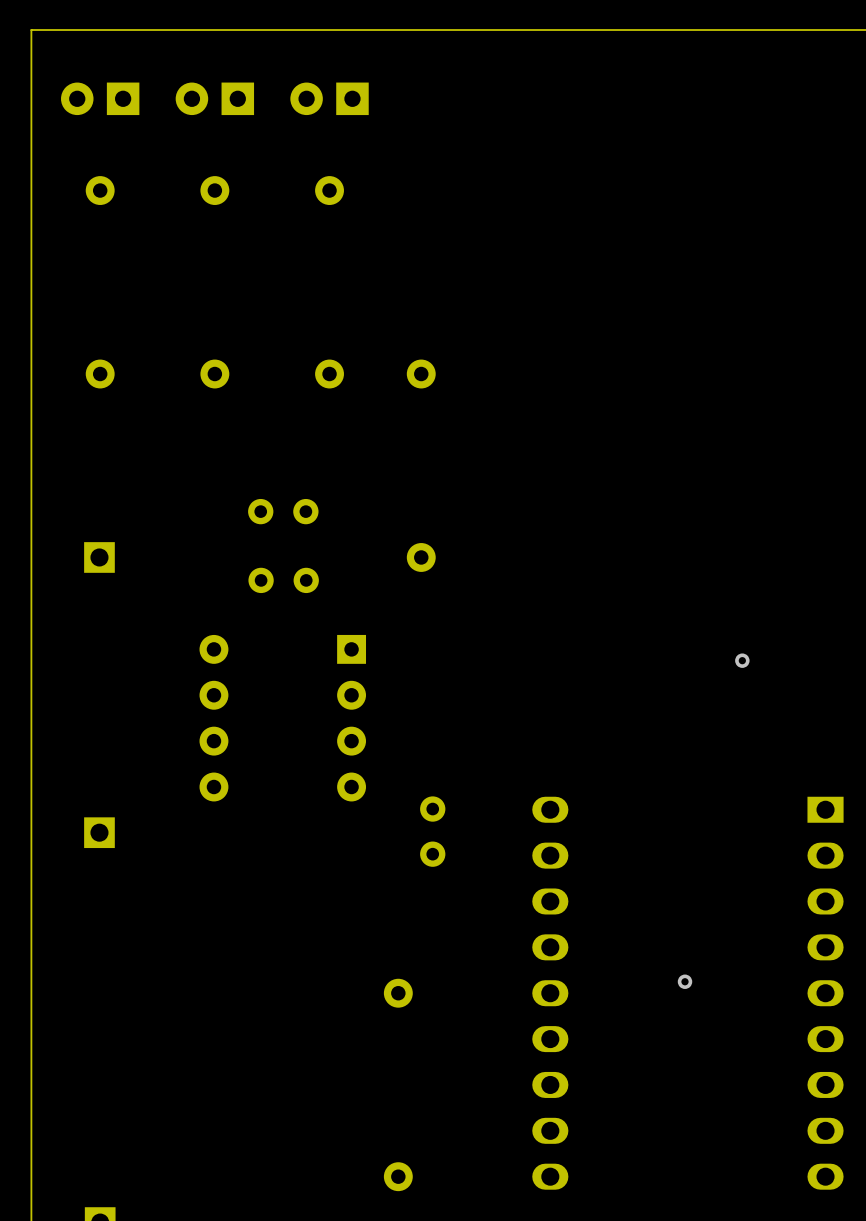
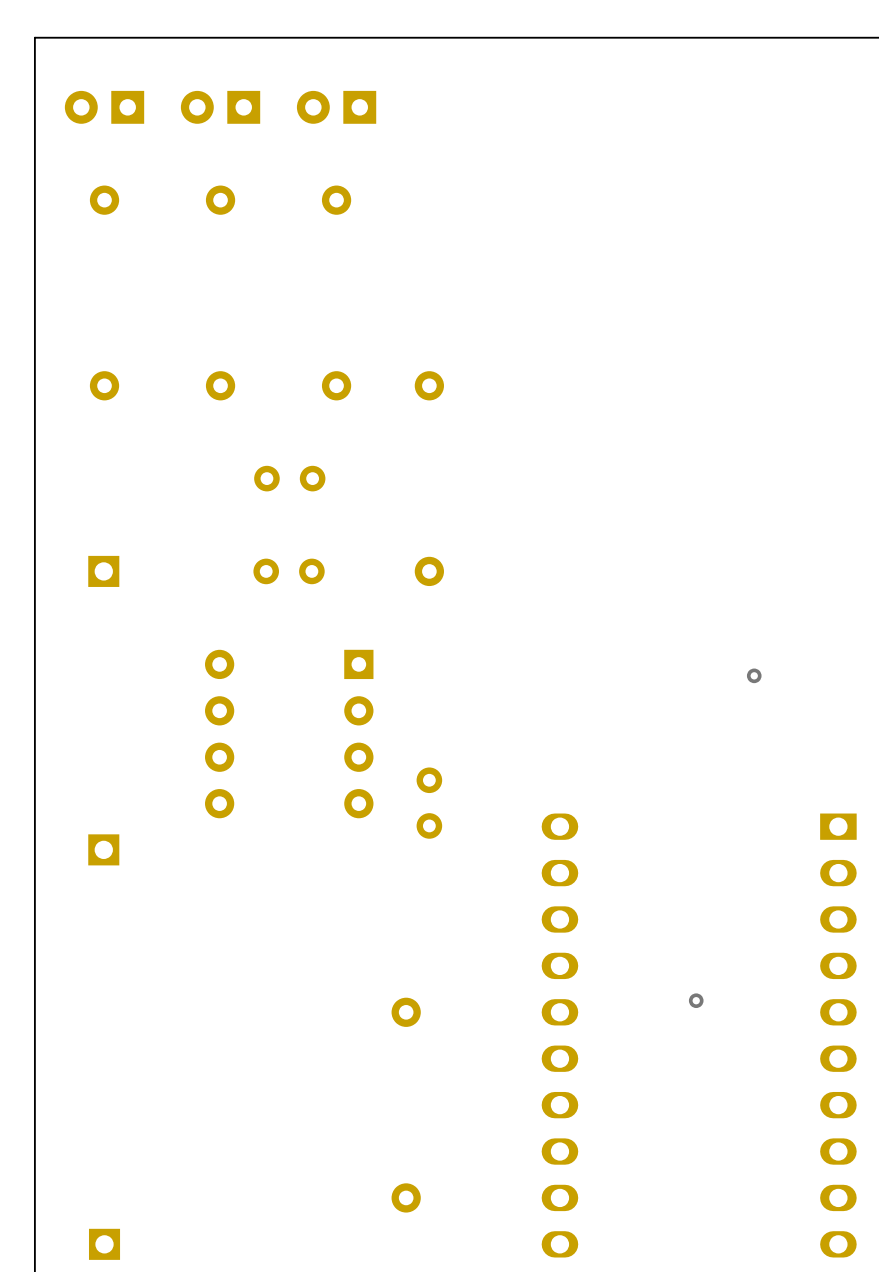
part: none -> (289, 478)
part: (283, 511) -> none
part: none -> (289, 571)
part: (283, 580) -> none
part position: (432, 831) -> (429, 803)

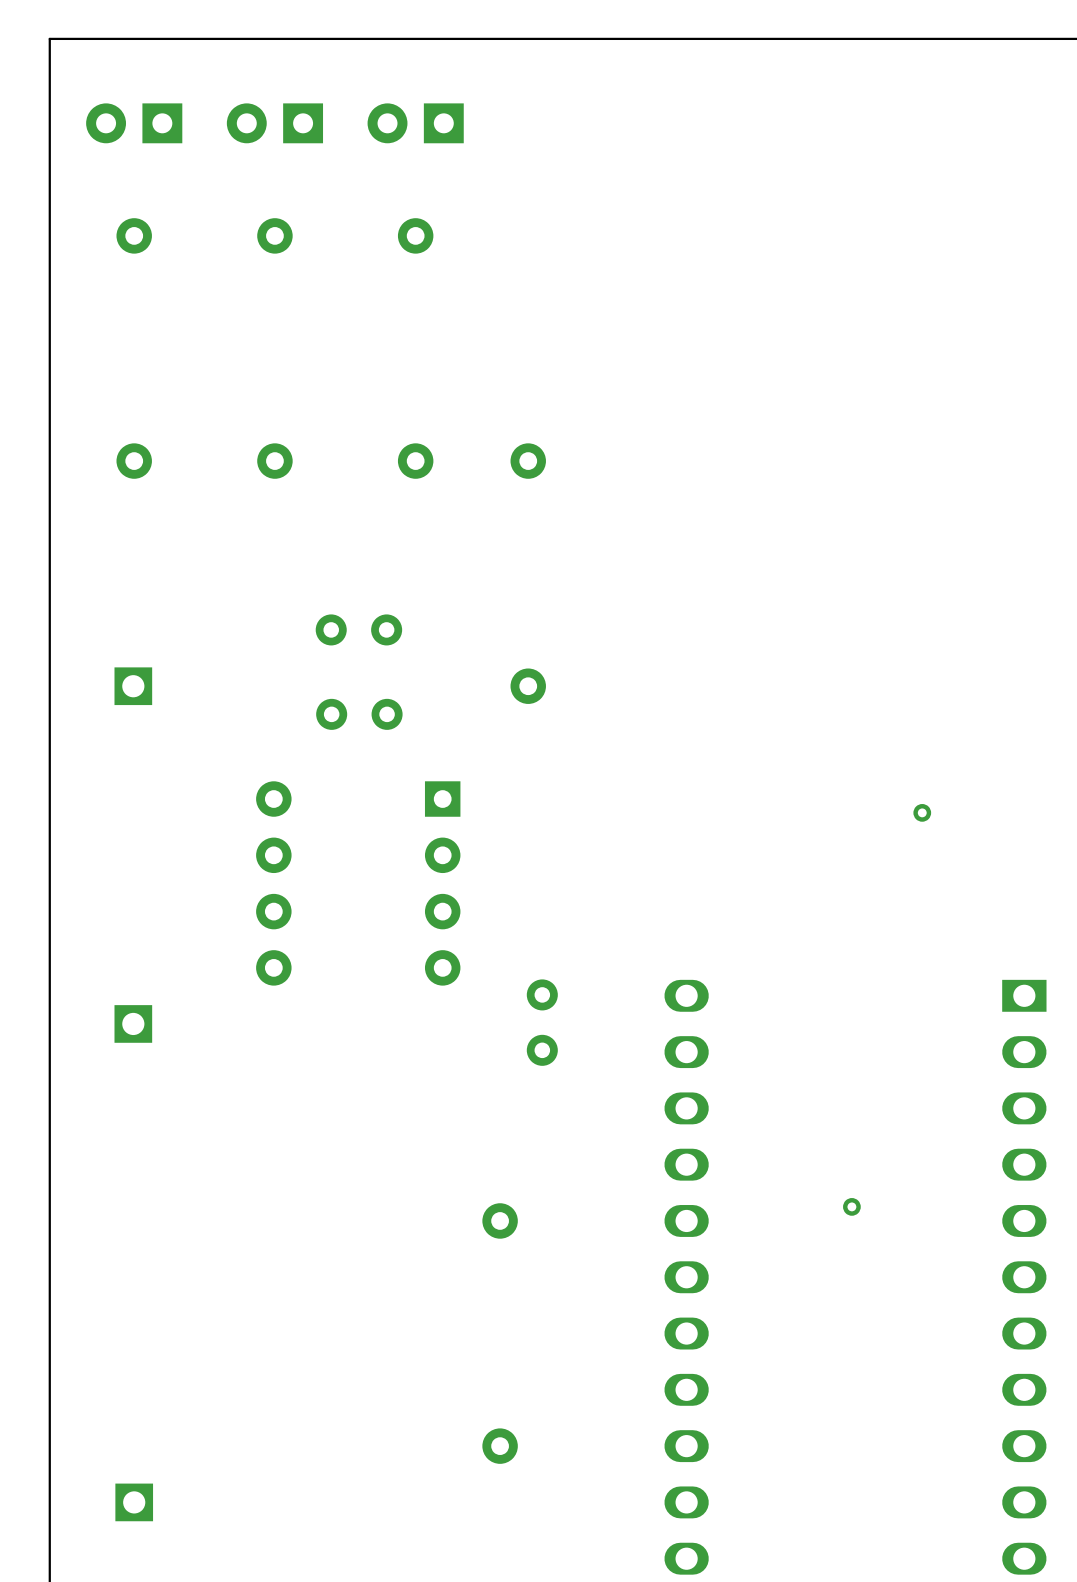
part: (289, 478) -> none
part: none -> (358, 629)
part: (289, 571) -> none
part: none -> (359, 714)
part position: (429, 803) -> (542, 1022)

